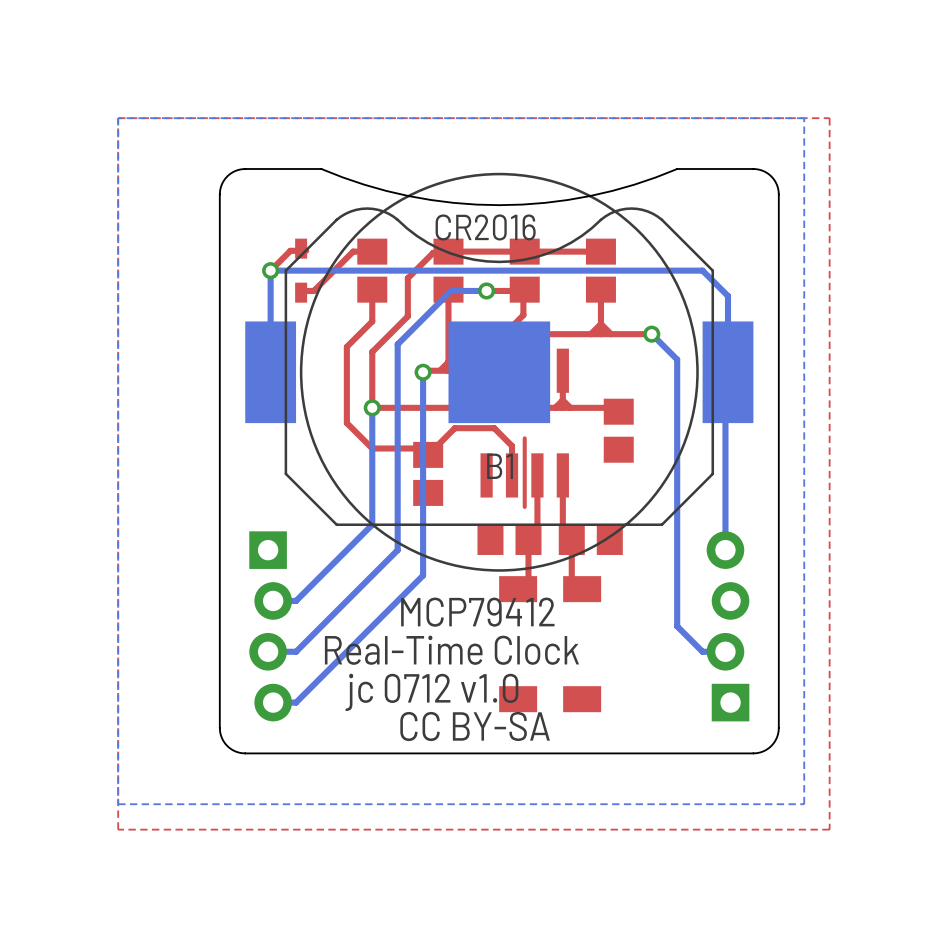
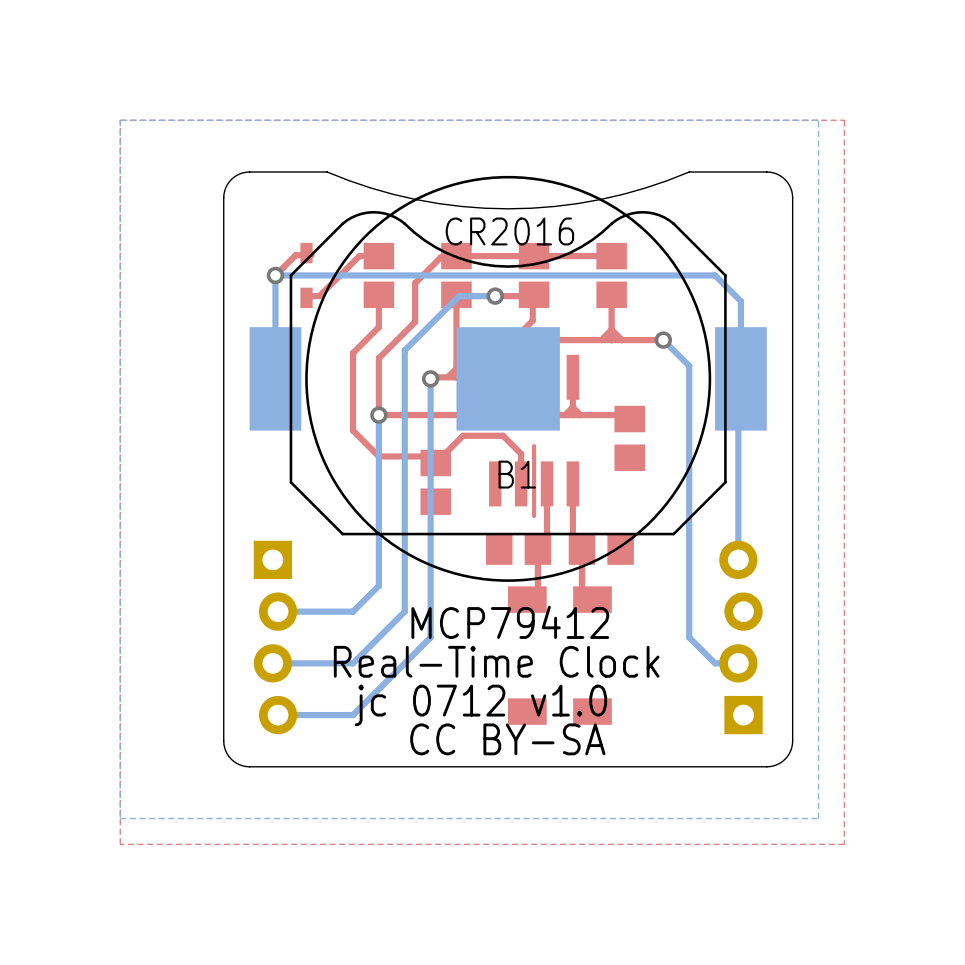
bottom track: (372, 524) (296, 600) -> none
bottom track: (397, 550) (372, 575) -> (378, 534) (378, 585)
bottom track: (423, 575) (397, 600) -> (404, 559) (404, 611)
bottom track: none -> (430, 585) (430, 637) (353, 715) (301, 715)
bottom track: (346, 600) (296, 651) -> (353, 611) (301, 611)
bottom track: (346, 651) (296, 702) -> (353, 663) (301, 663)

